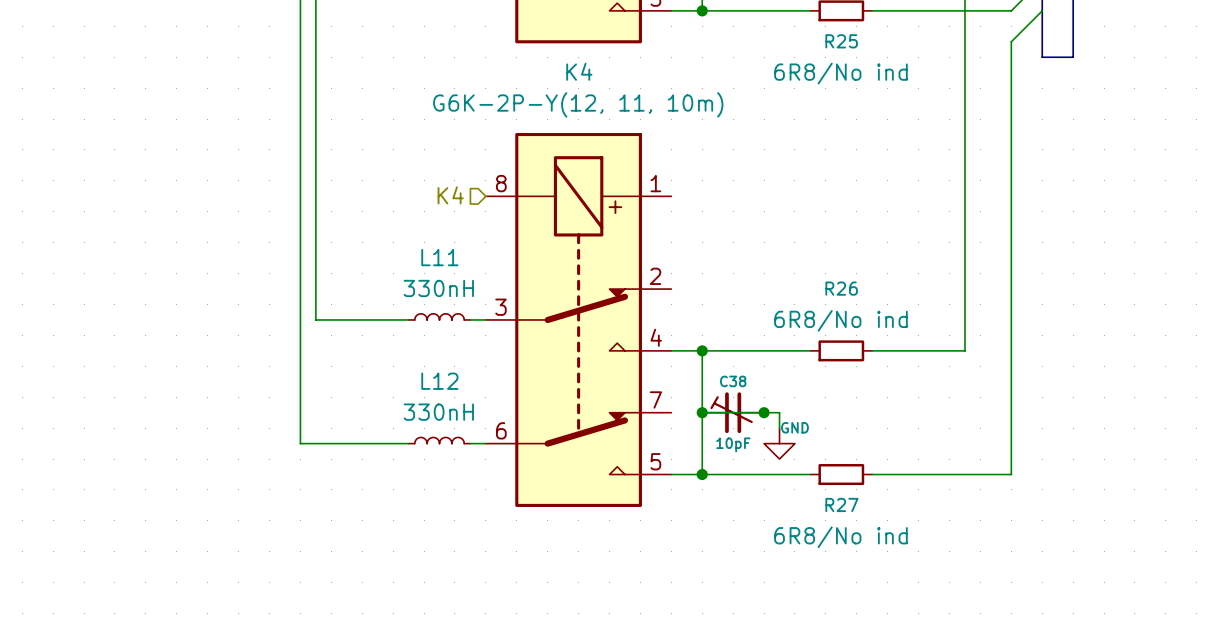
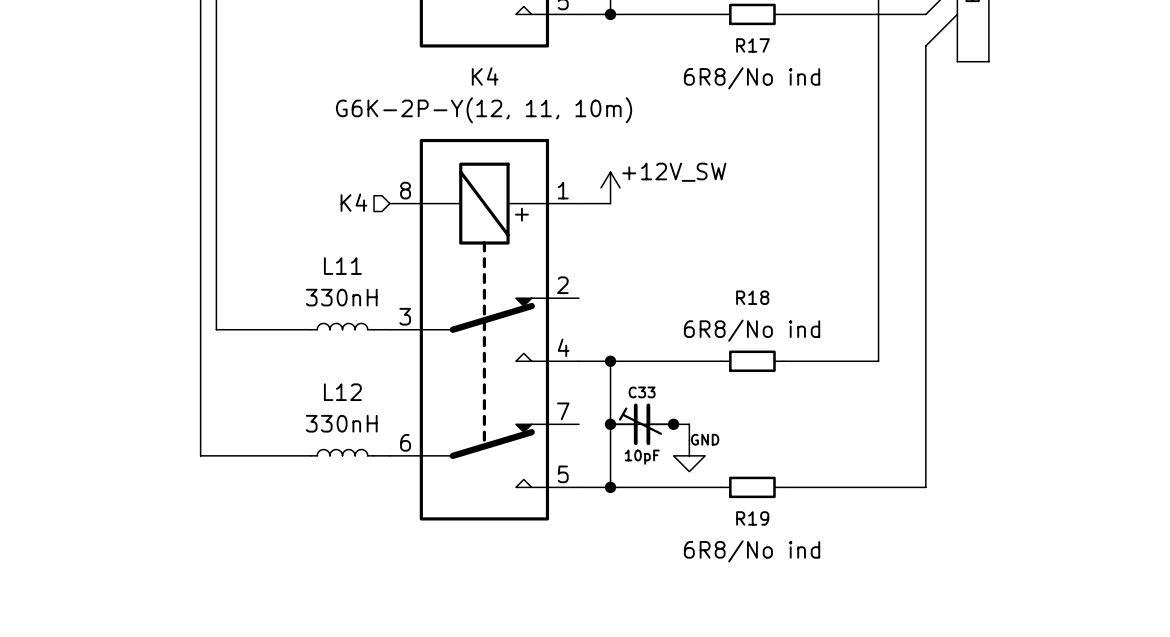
R25 name: R25 (841, 41) -> R17 (753, 45)
power symbol: none -> +12V_SW (610, 187)
wire: none -> (578, 203) (610, 203)
R26 name: R26 (841, 288) -> R18 (752, 297)
C38 name: C38 (733, 381) -> C33 (642, 392)
R27 name: R27 (841, 504) -> R19 (752, 518)

